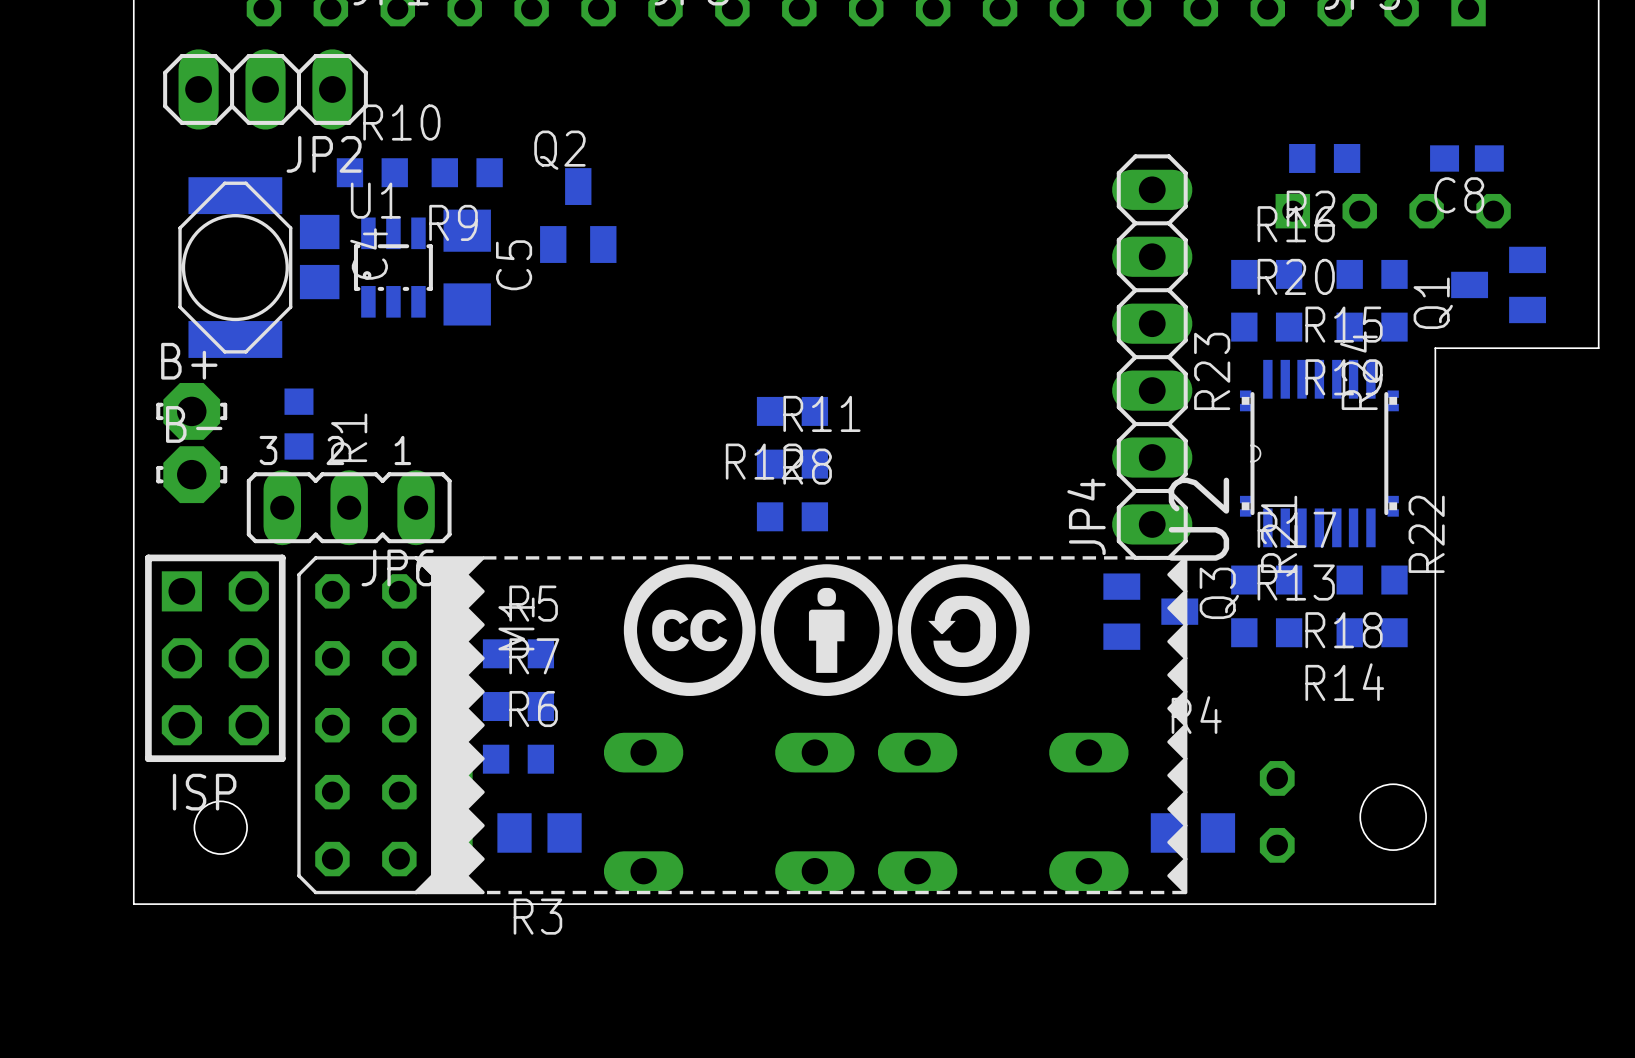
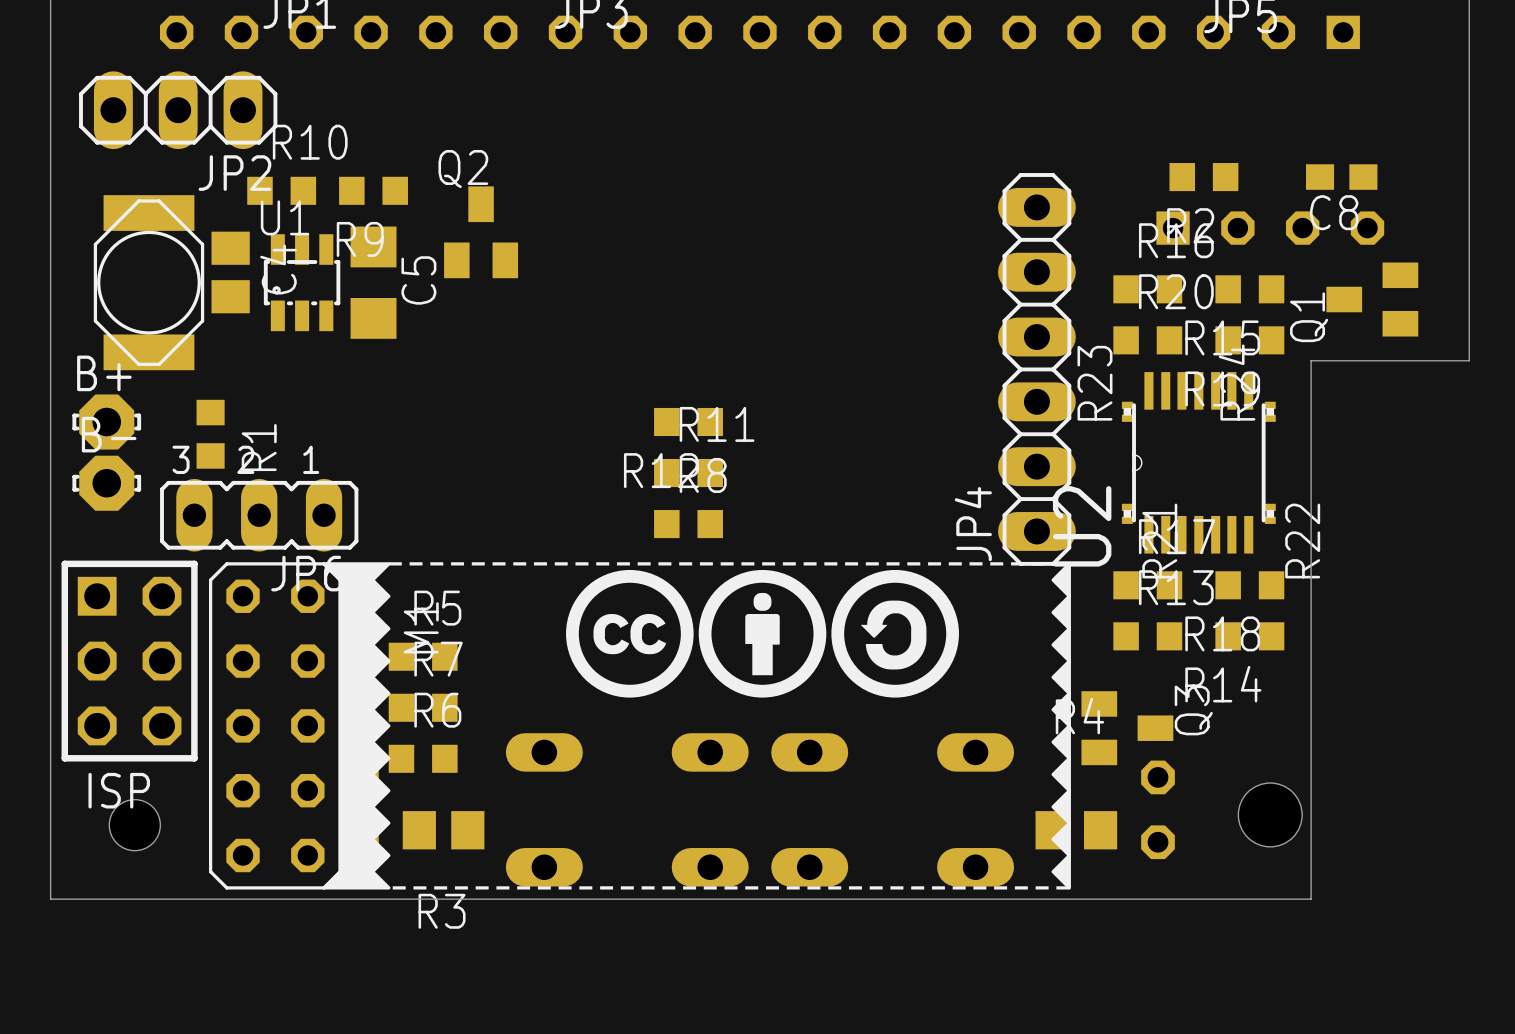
Q3 position: (1150, 611) -> (1127, 728)
drawing position: (689, 630) -> (629, 633)
drawing position: (826, 630) -> (762, 633)
drawing position: (963, 630) -> (895, 633)

